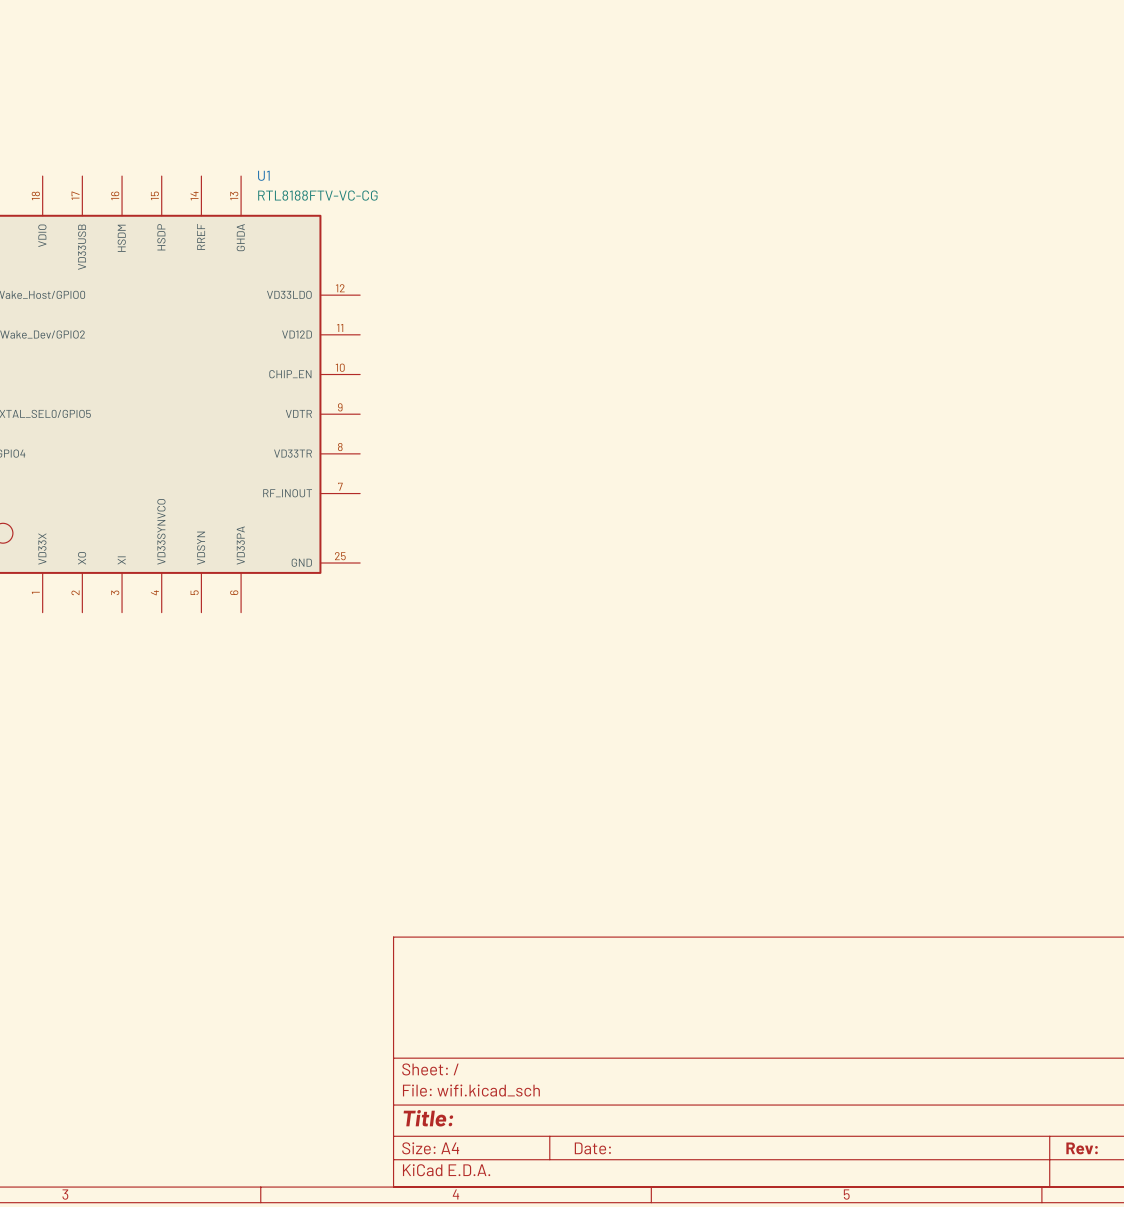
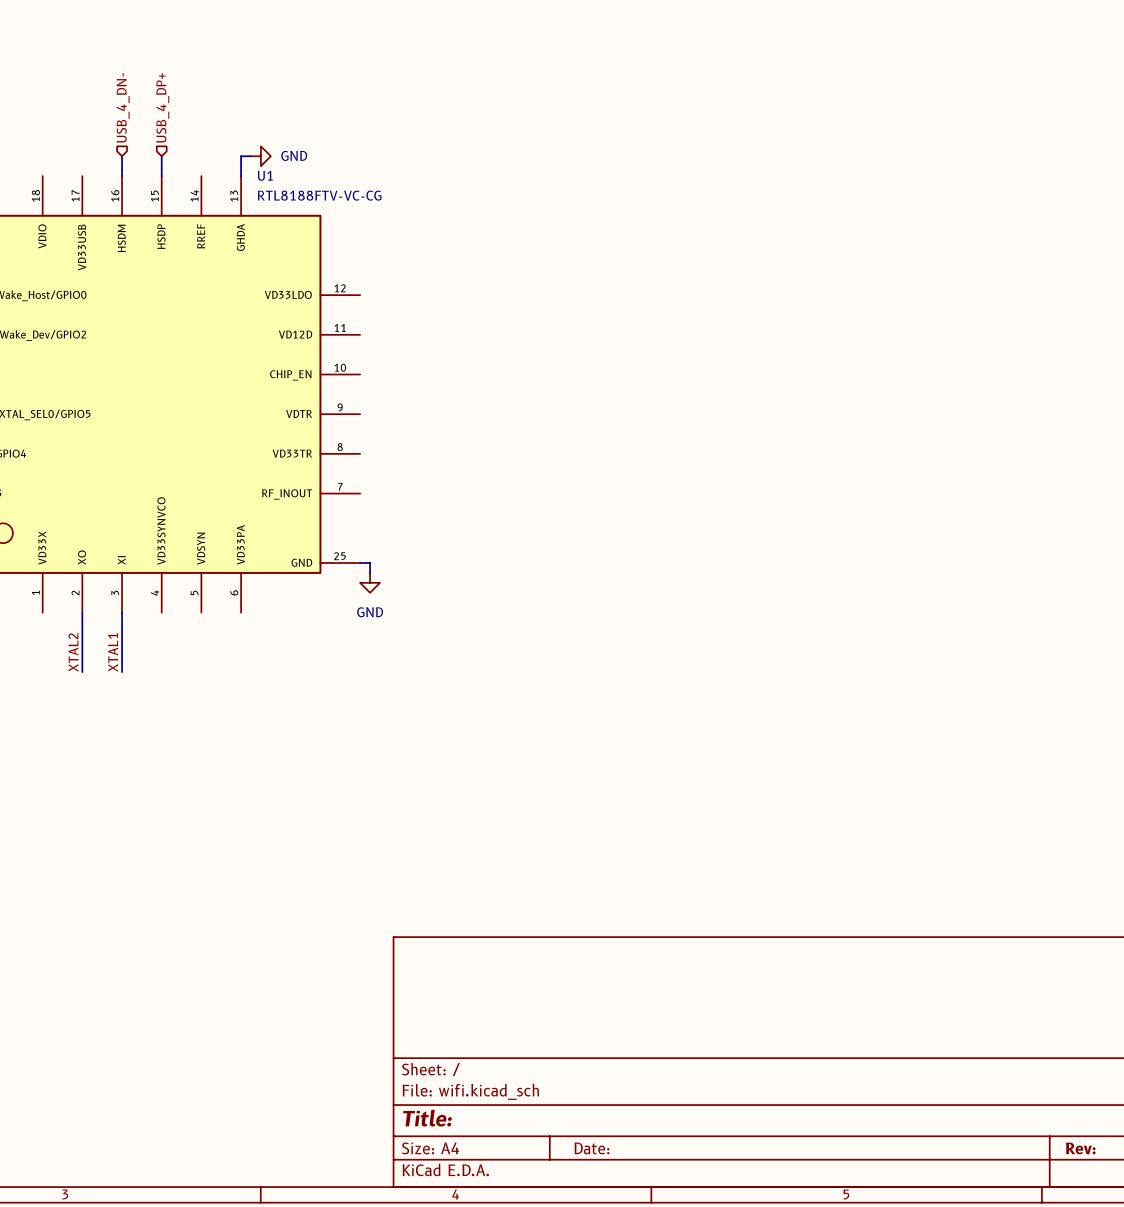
hierarchical label: none -> USB_4_DN- (123, 107)
hierarchical label: none -> USB_4_DP+ (162, 107)
wire: none -> (122, 156) (122, 176)
wire: none -> (161, 156) (161, 176)
wire: none -> (250, 156) (241, 156) (241, 176)
power symbol: none -> GND (260, 156)
wire: none -> (360, 563) (370, 563) (370, 572)
power symbol: none -> GND (370, 582)
wire: none -> (82, 612) (82, 672)
wire: none -> (122, 612) (122, 672)
label: none -> XTAL2 (73, 652)
label: none -> XTAL1 (113, 652)

